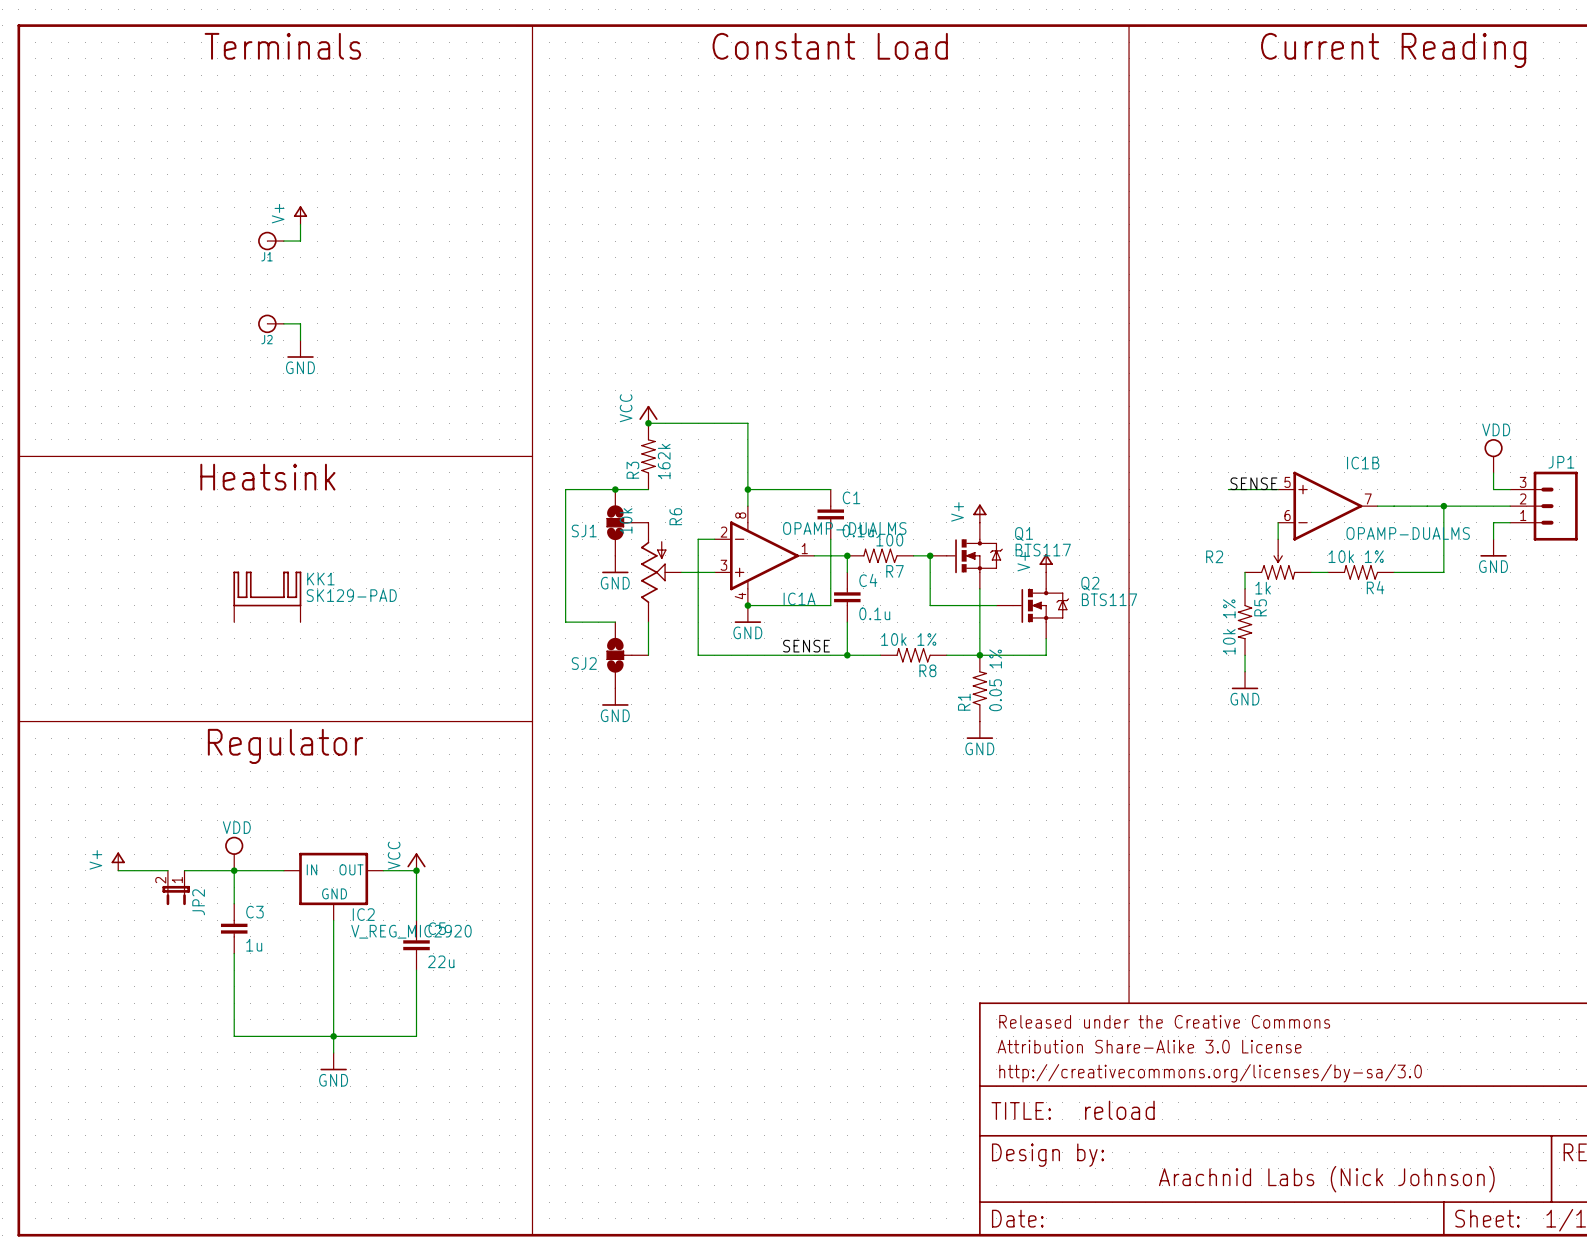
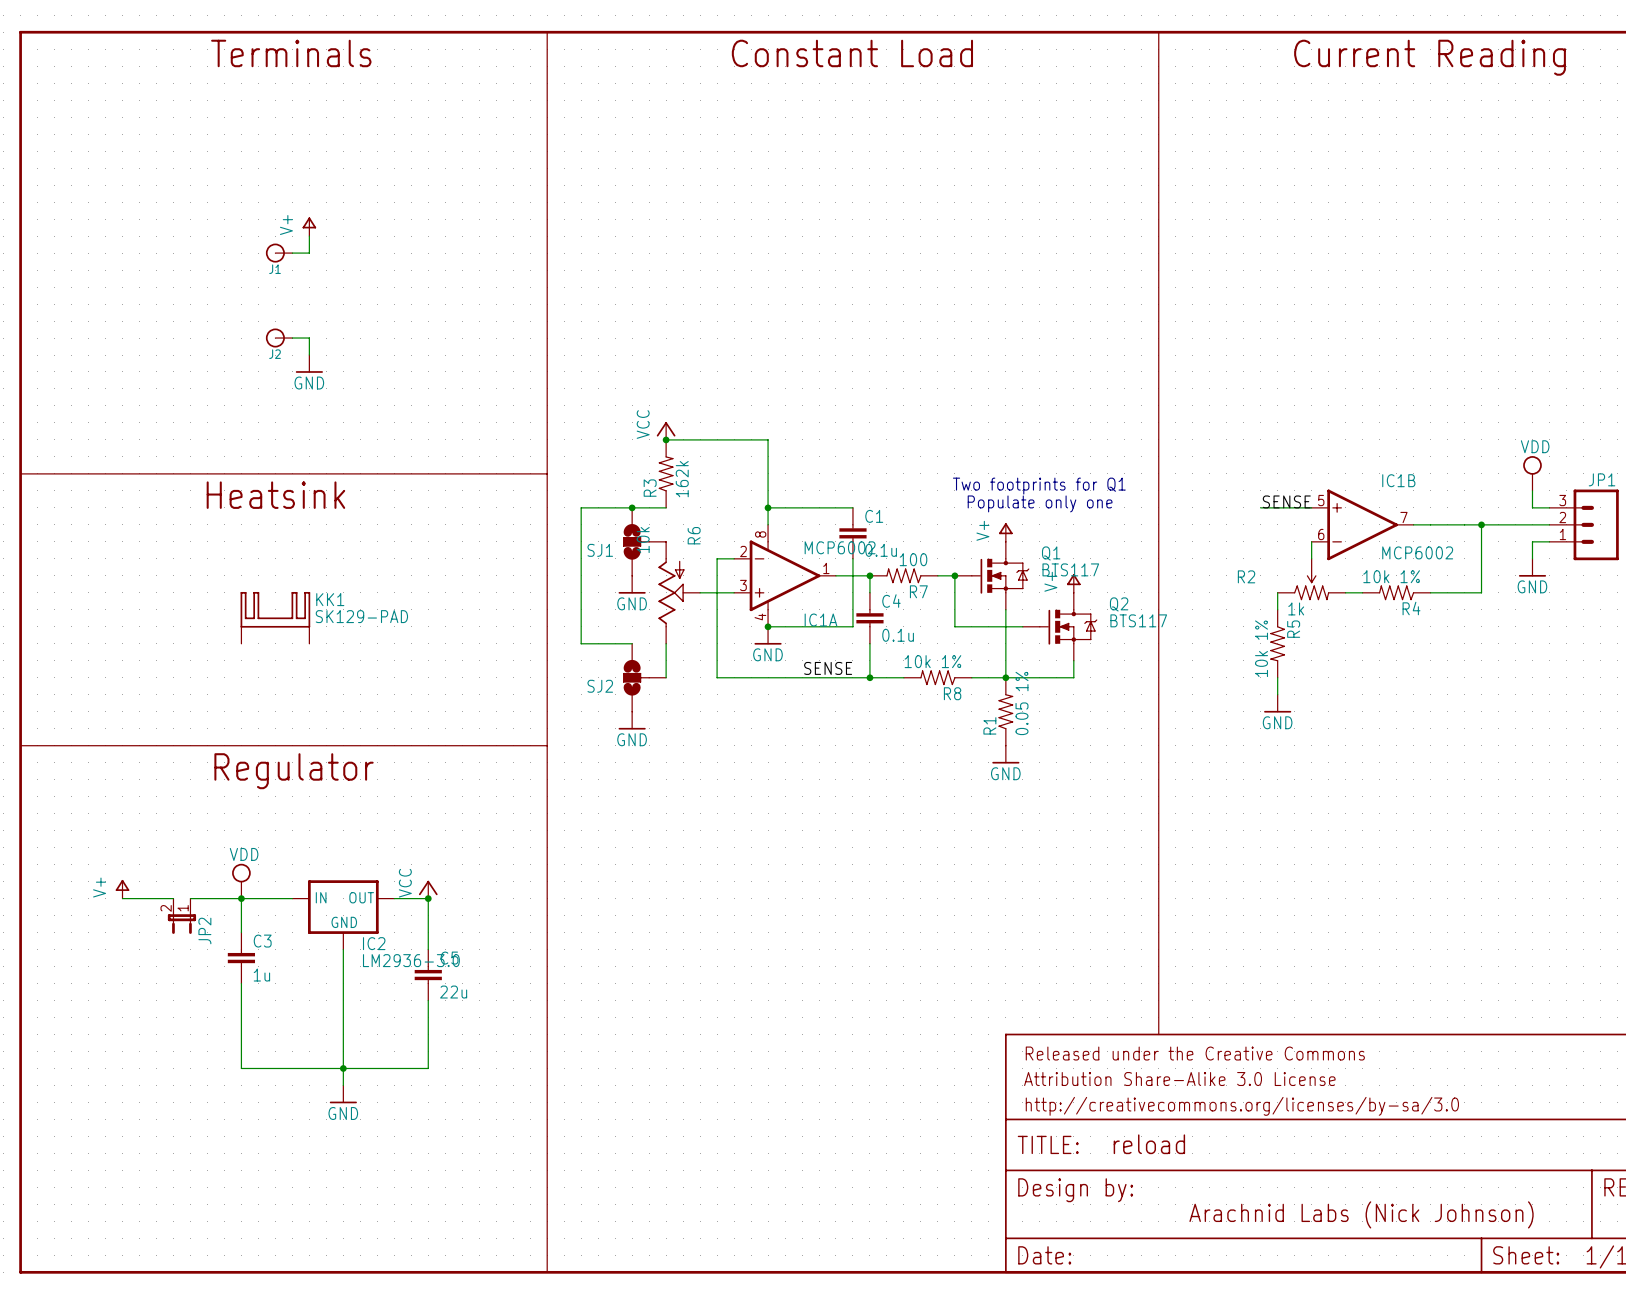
text: none -> Two footprints for Q1 (1039, 486)
text: none -> Populate only one (1040, 503)
IC1A value: OPAMP-DUALMS (844, 528) -> MCP6002 (840, 547)
IC1B value: OPAMP-DUALMS (1408, 533) -> MCP6002 (1417, 552)
IC2 value: V_REG_MIC2920 (411, 931) -> LM2936-3.0 (411, 960)

